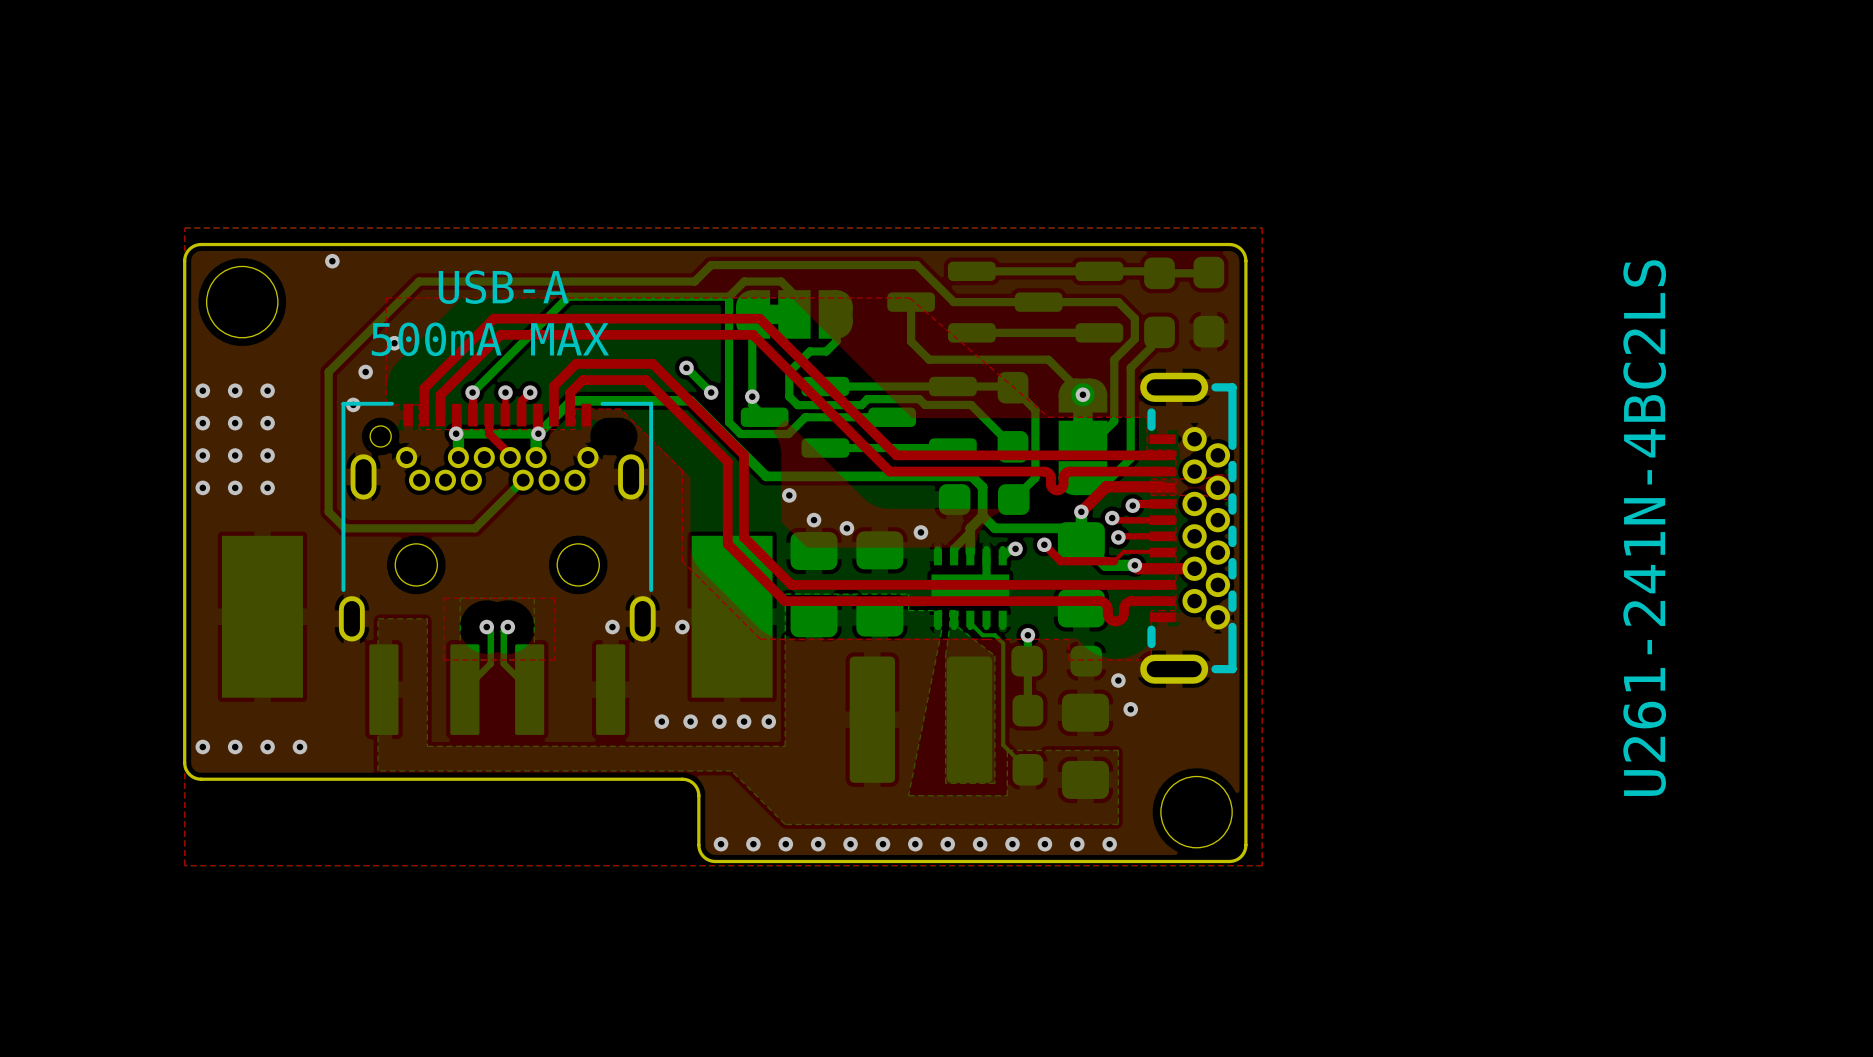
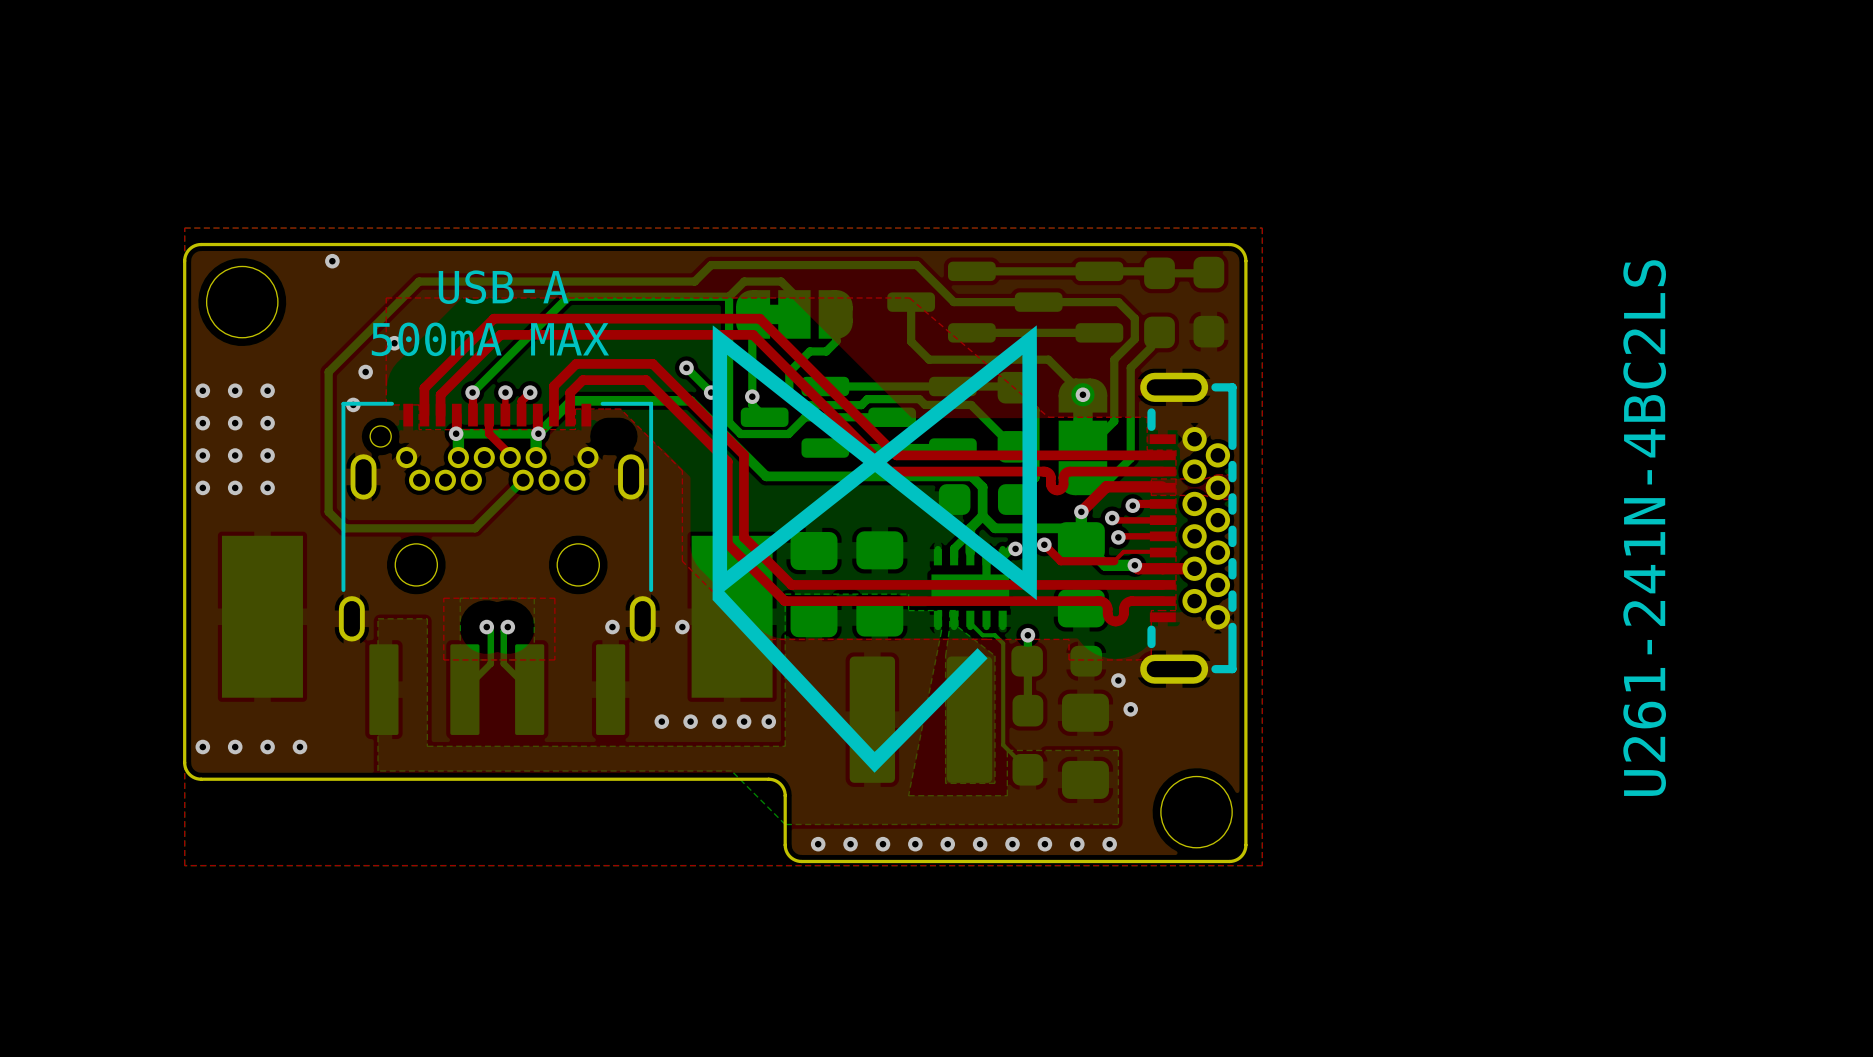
drawing: none -> [712, 325, 1037, 773]
via: (789, 495) -> none
via: (814, 520) -> none
via: (846, 528) -> none
via: (920, 532) -> none
board edge: (682, 779) (692, 782) (698, 791) (698, 847) (705, 858) (715, 861) (801, 861) -> (682, 779) (768, 779) (778, 782) (785, 793) (785, 849) (791, 858) (801, 861)
via: (721, 844) -> none
via: (753, 844) -> none
via: (785, 844) -> none

